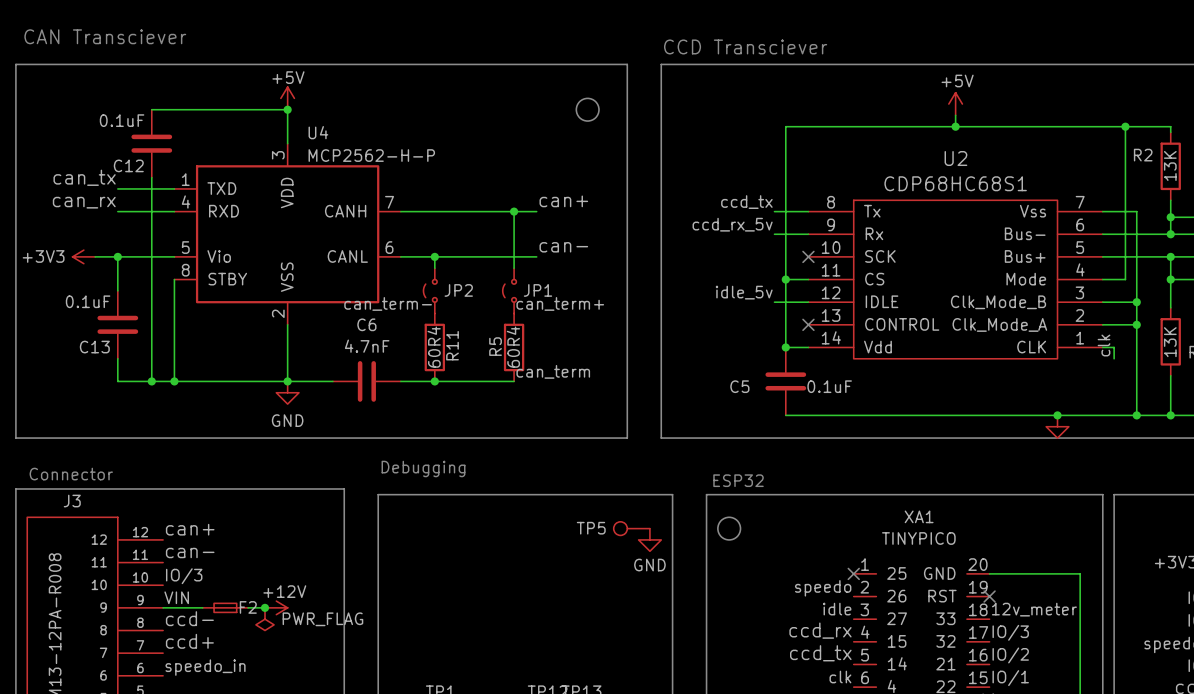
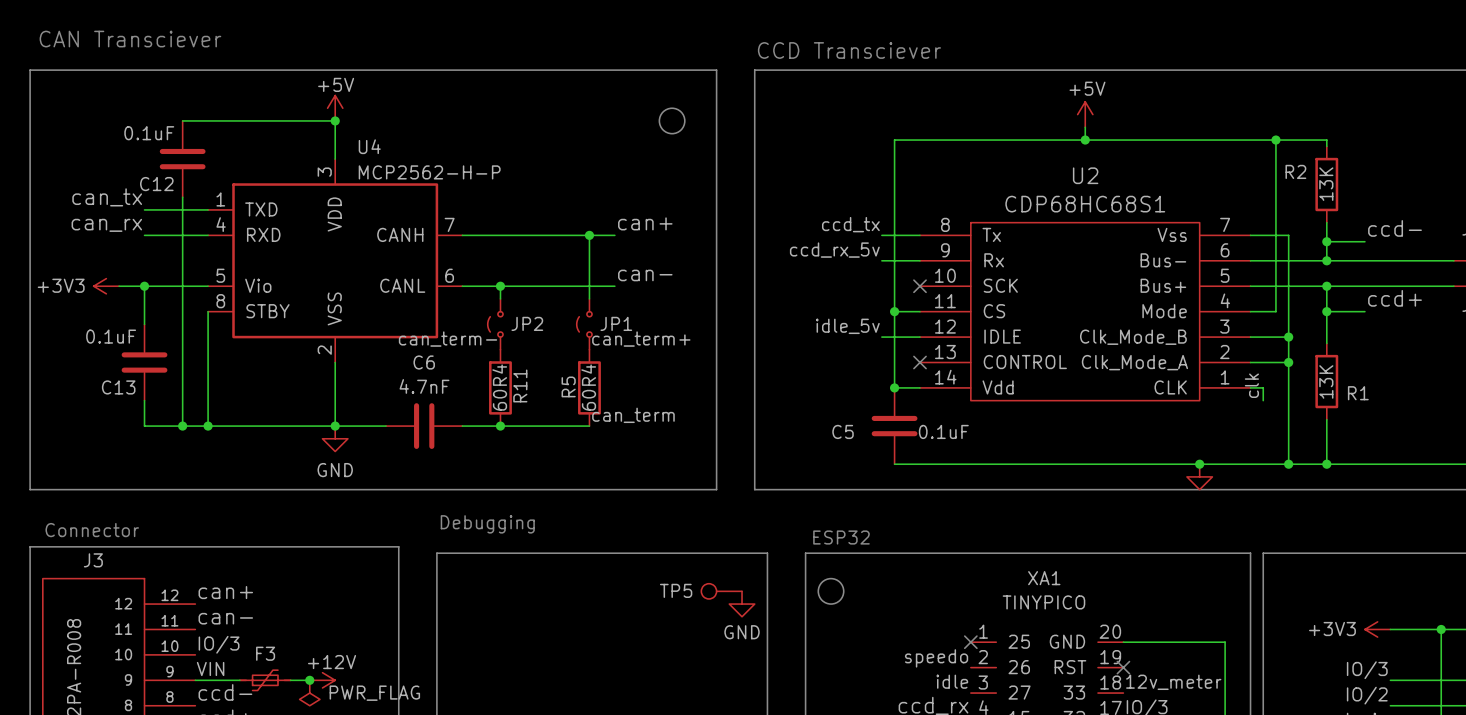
F2: (225, 607) -> none
F3: none -> (265, 680)

